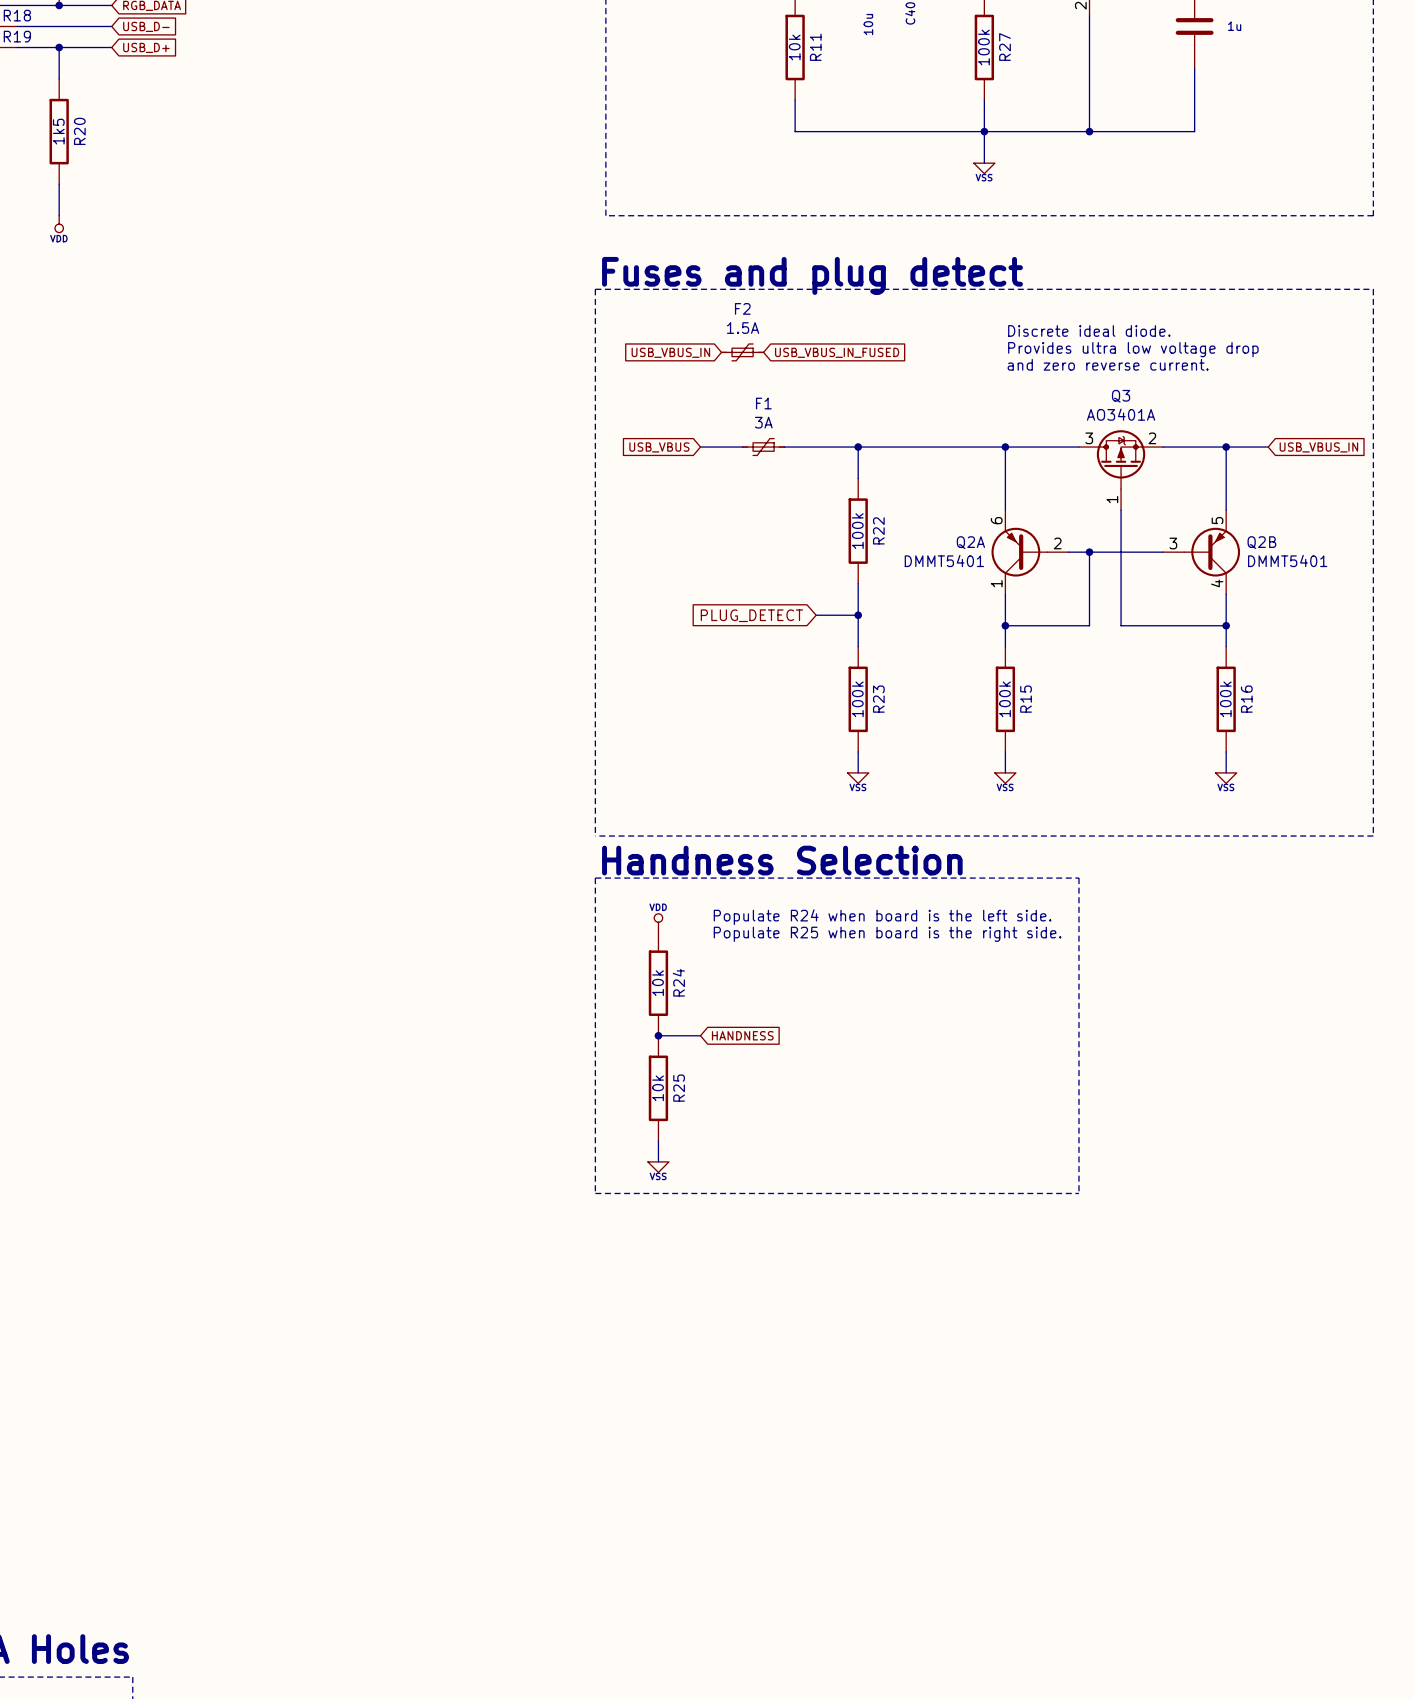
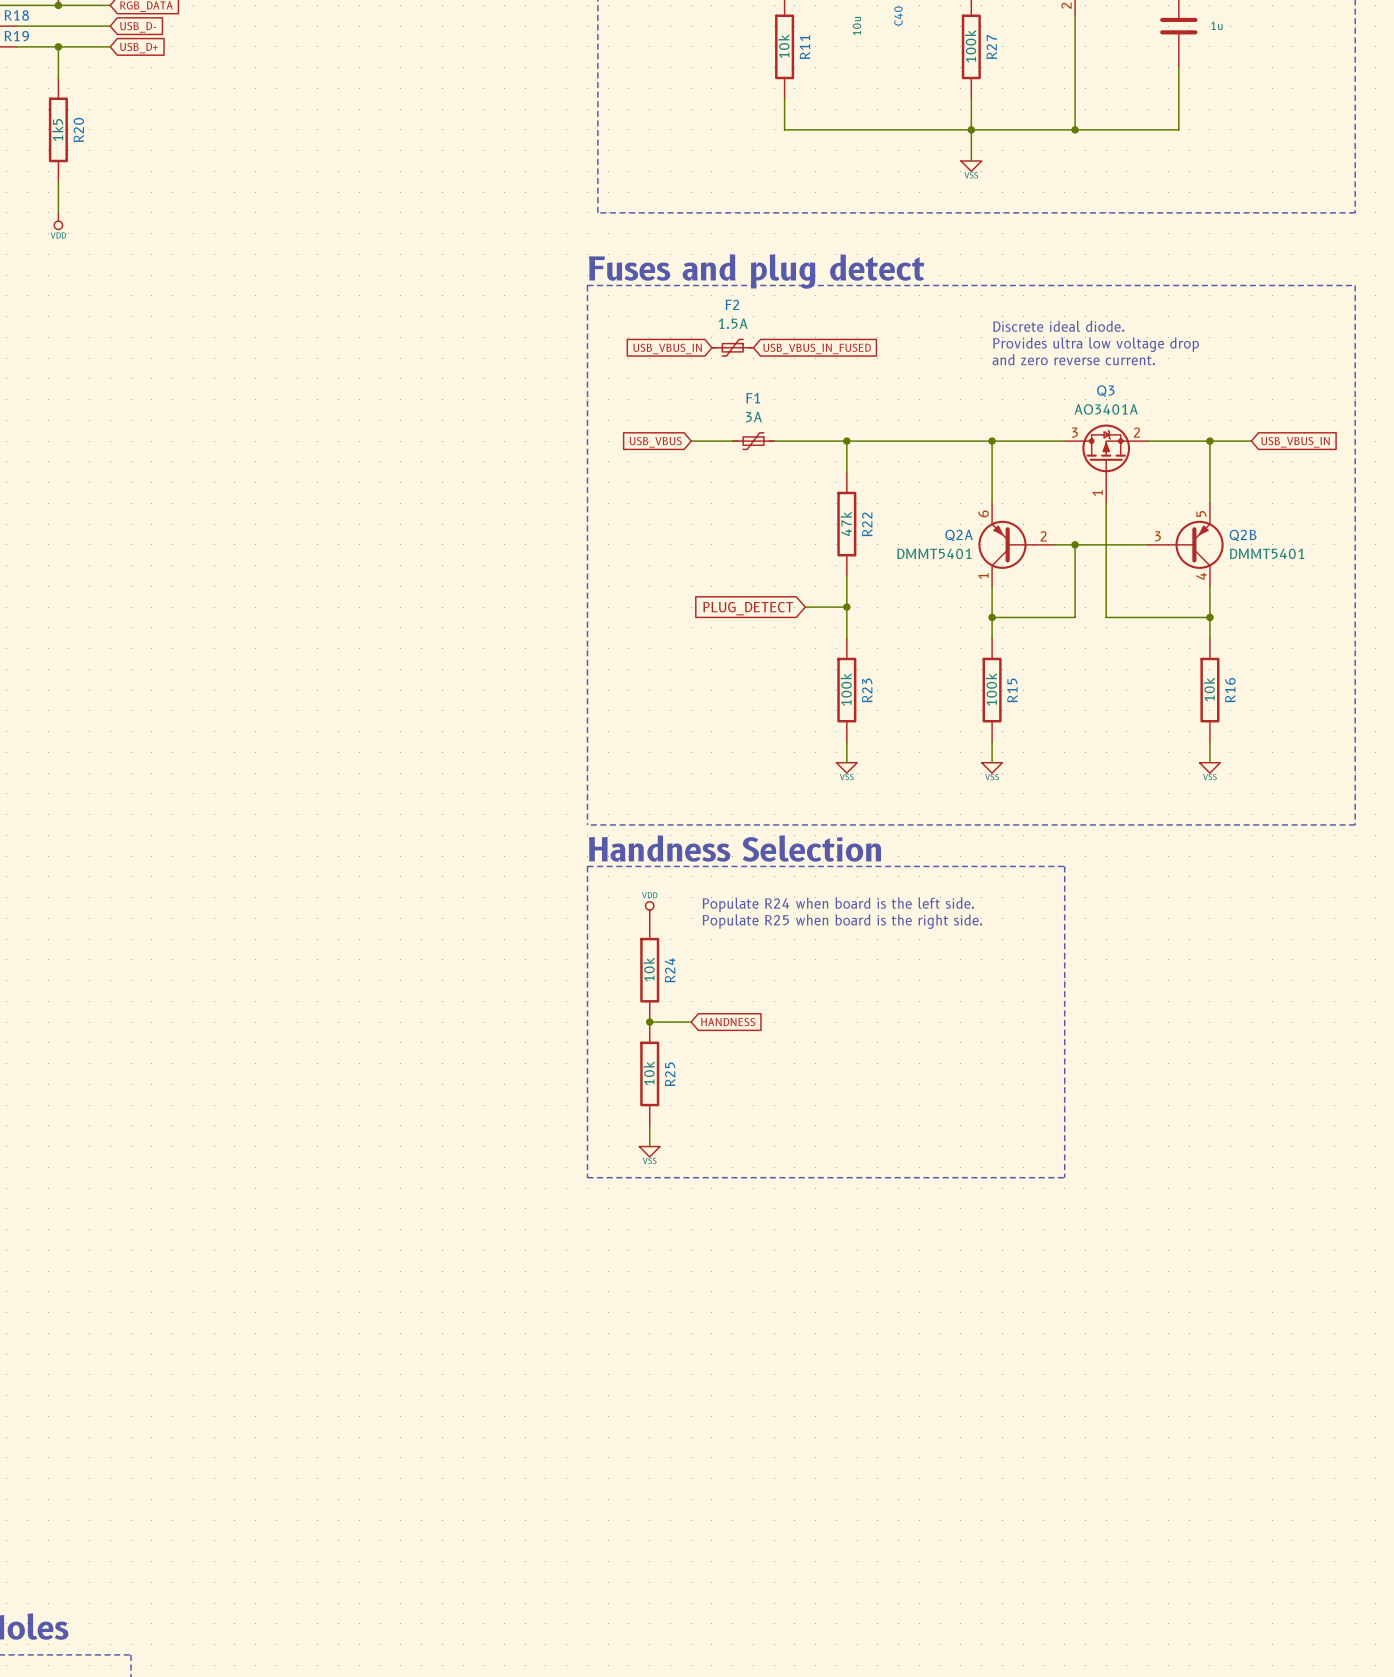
R22 value: 100k (857, 531) -> 47k (846, 523)
R16 value: 100k (1225, 699) -> 10k (1209, 689)

